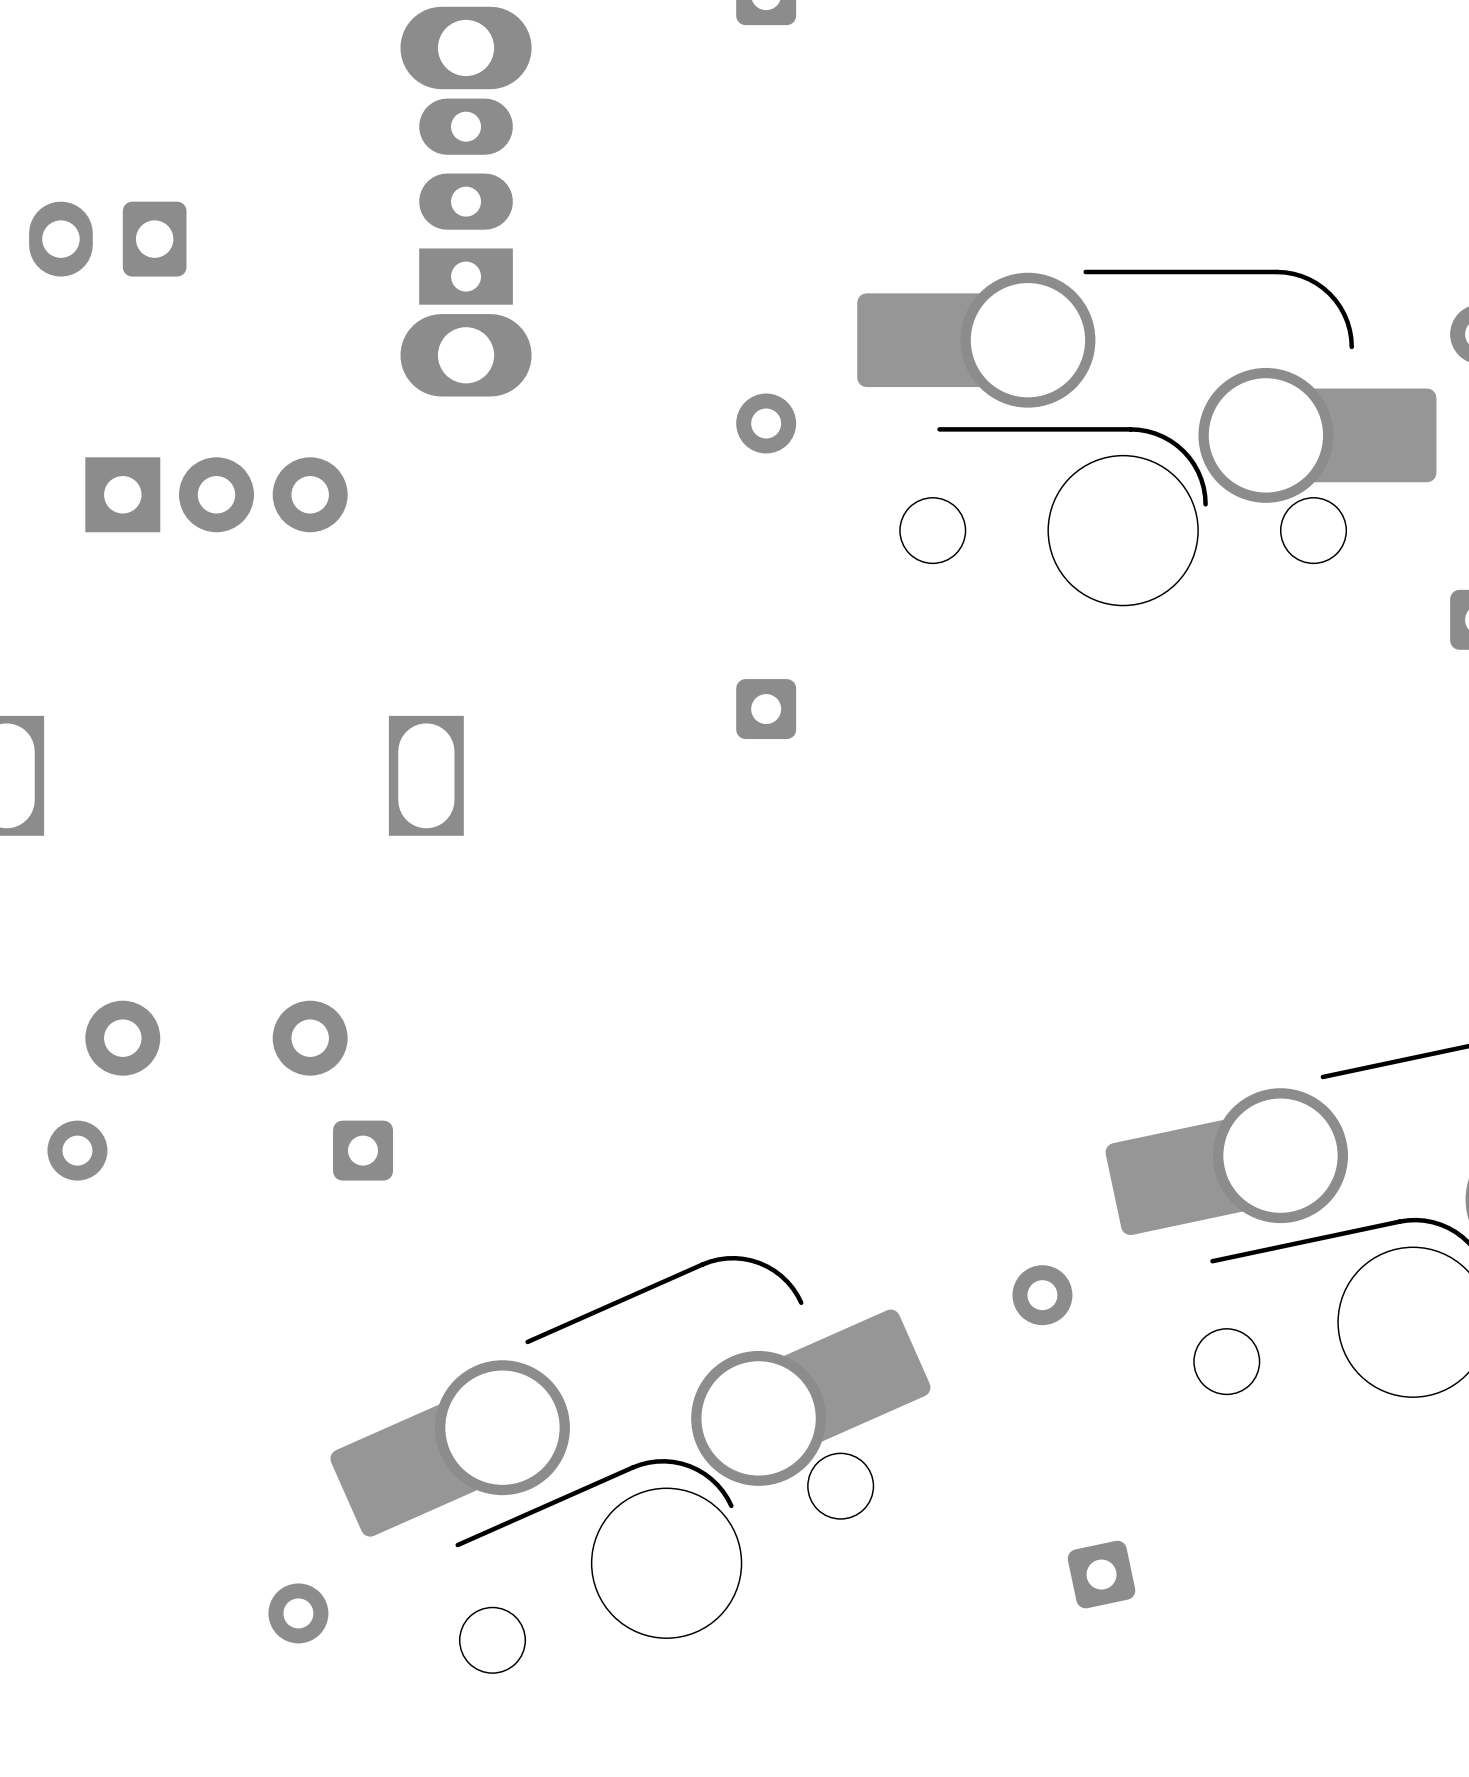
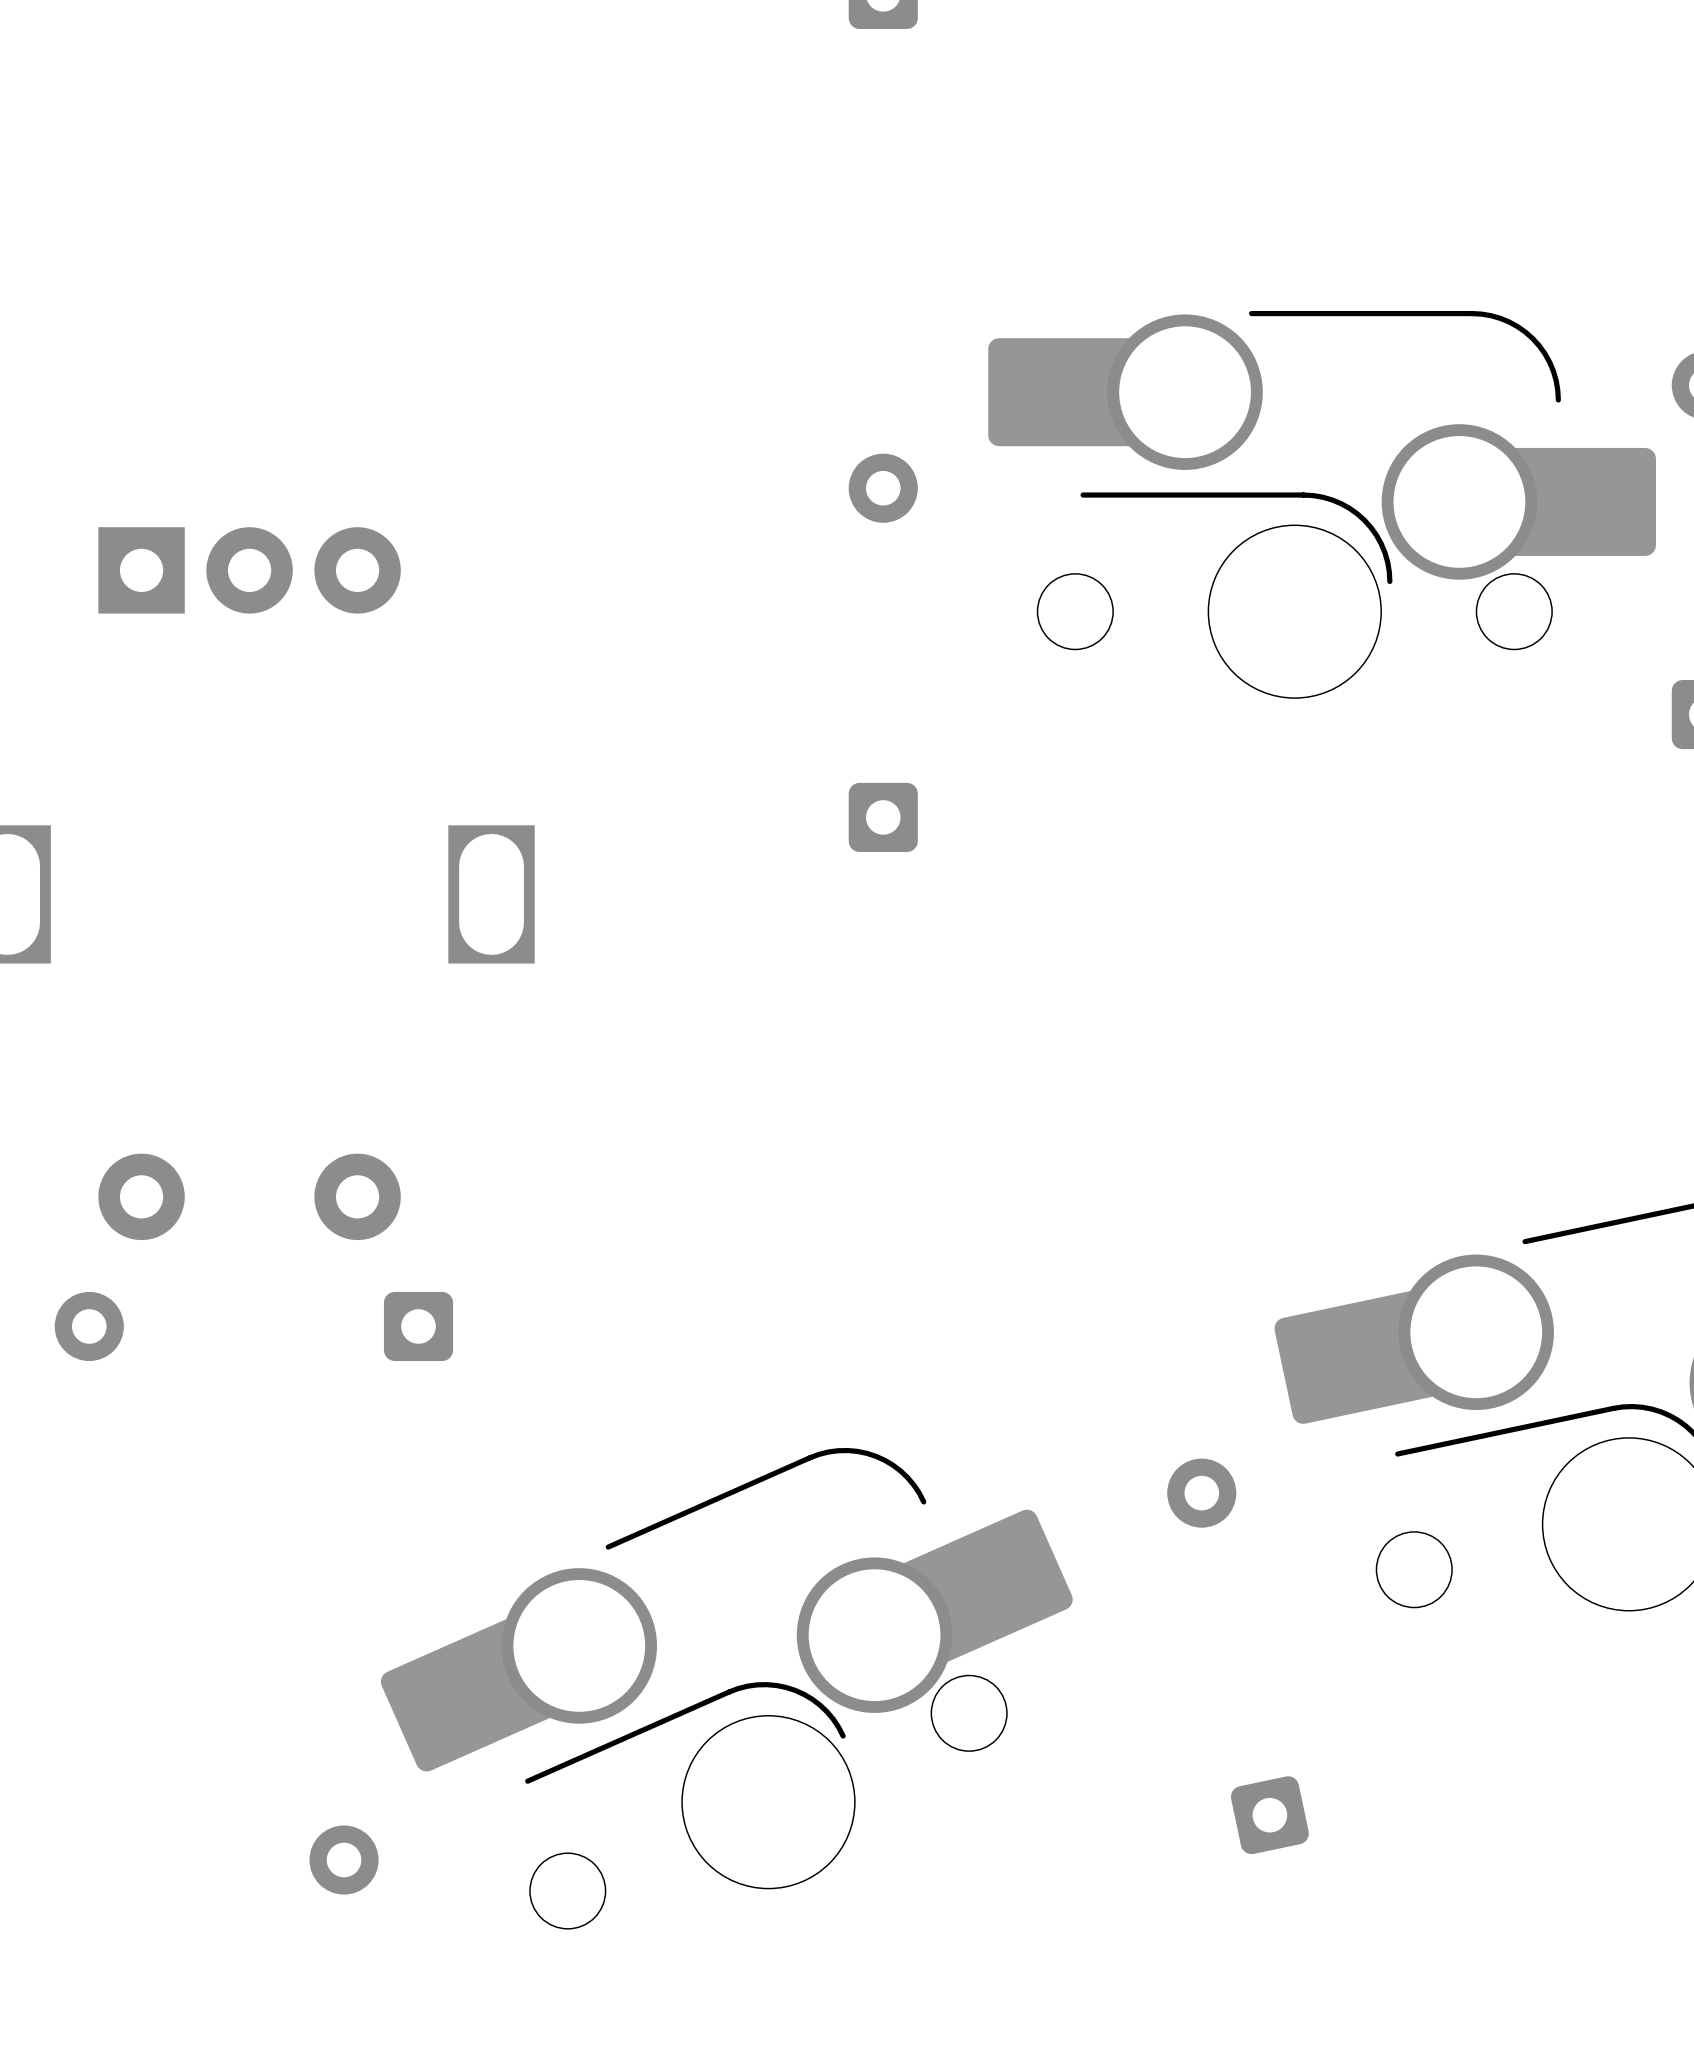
part: (466, 201) -> none
part: (107, 239) -> none

